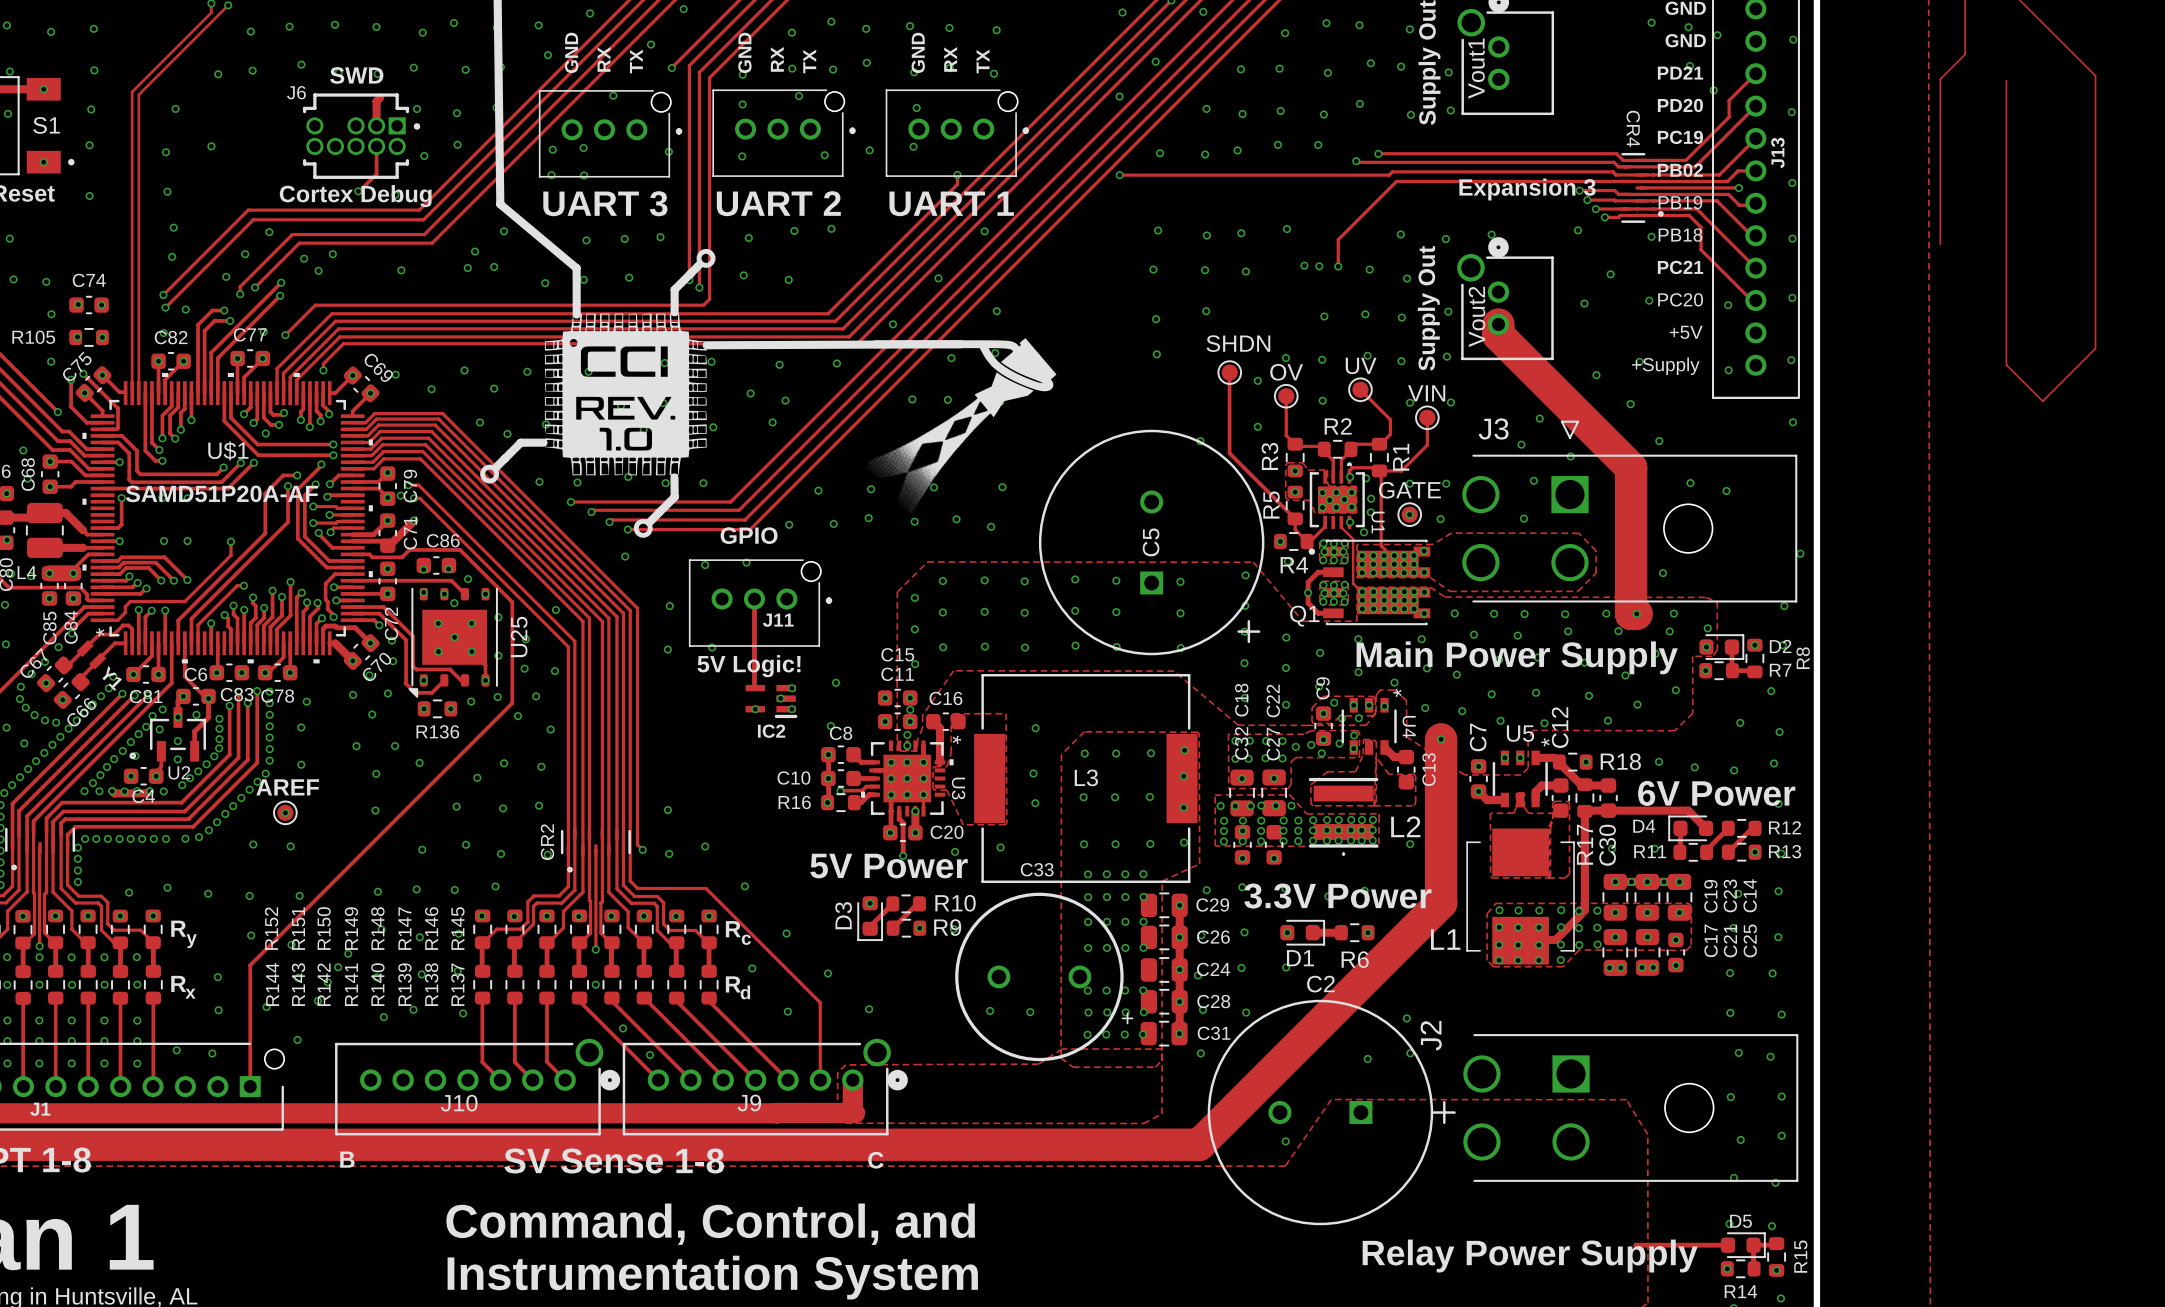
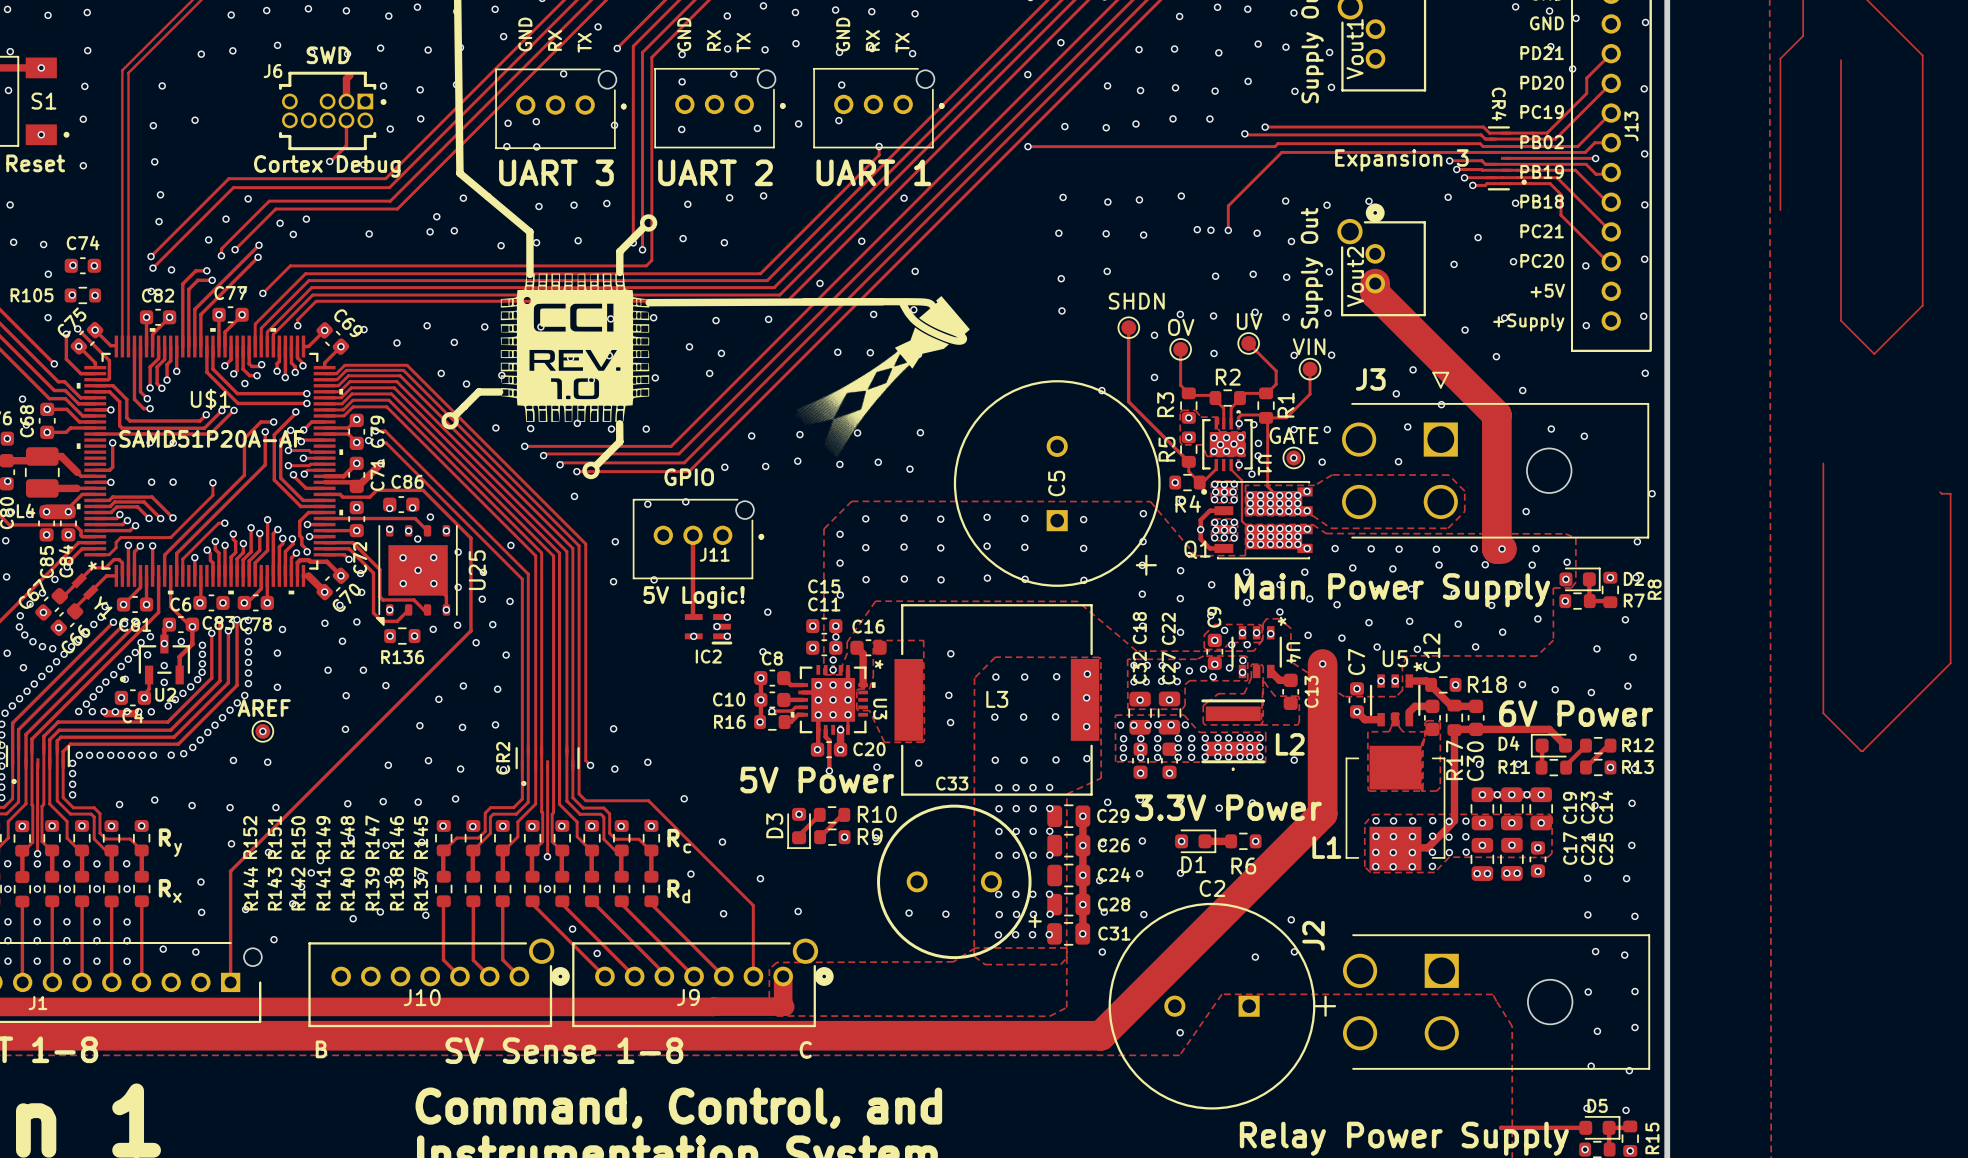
track: none -> (1823, 463) (1823, 713) (1861, 751) (1950, 663) (1950, 493) (1940, 492)

